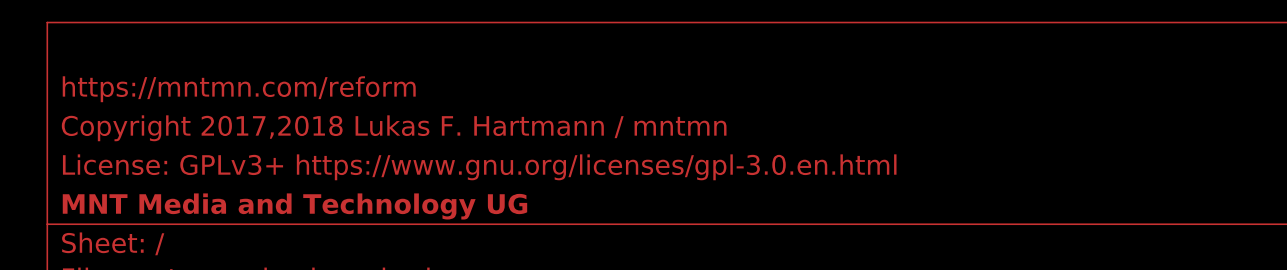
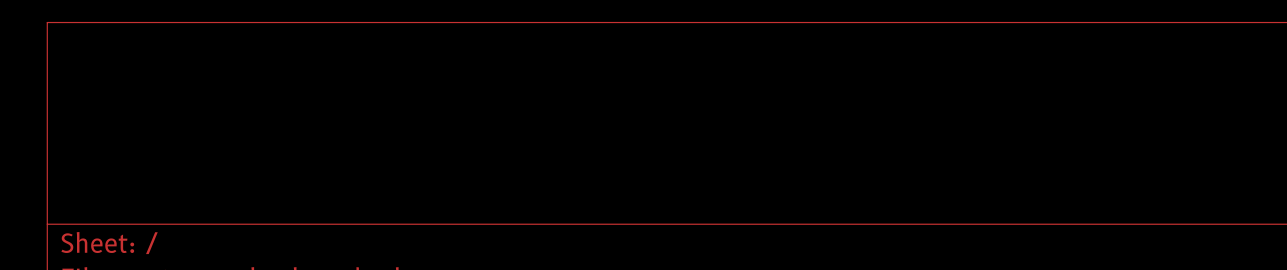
title block: https://mntmn.com/reform (239, 89) -> none
title block: Copyright 2017,2018 Lukas F. Hartmann / mntmn (394, 128) -> none
title block: License: GPLv3+ https://www.gnu.org/licenses/gpl-3.0.en.html (479, 167) -> none
title block: MNT Media and Technology UG (294, 206) -> none

